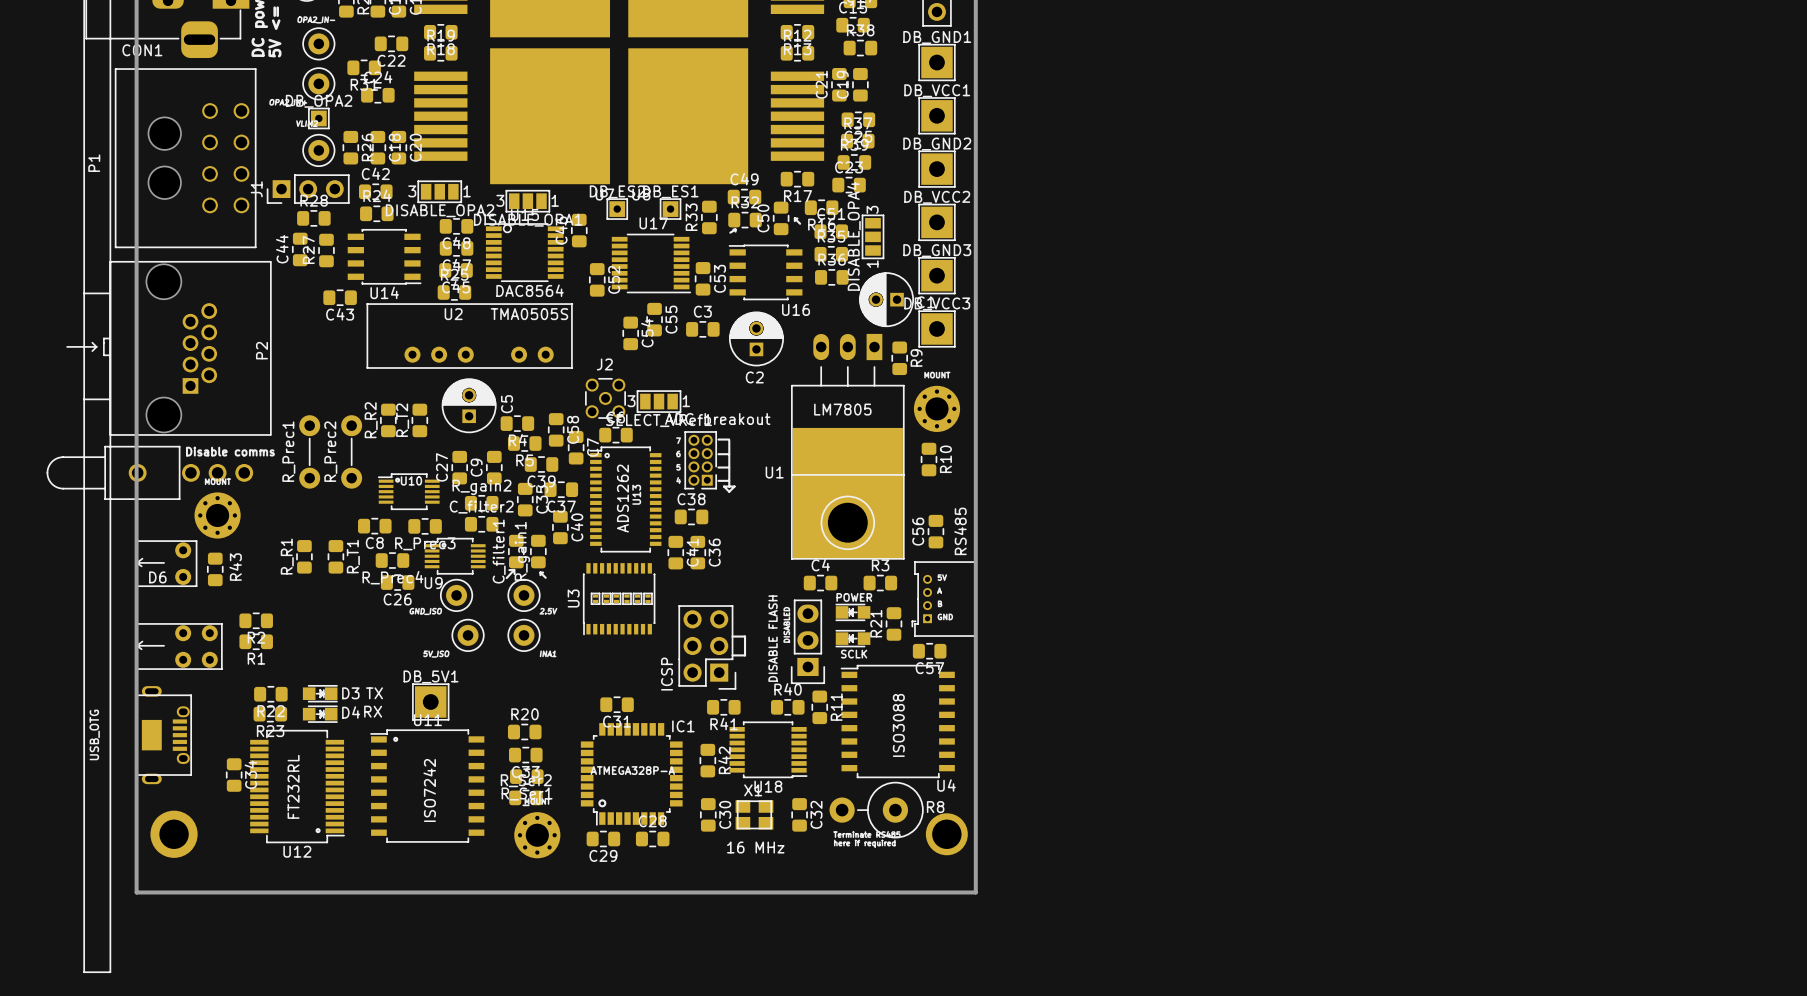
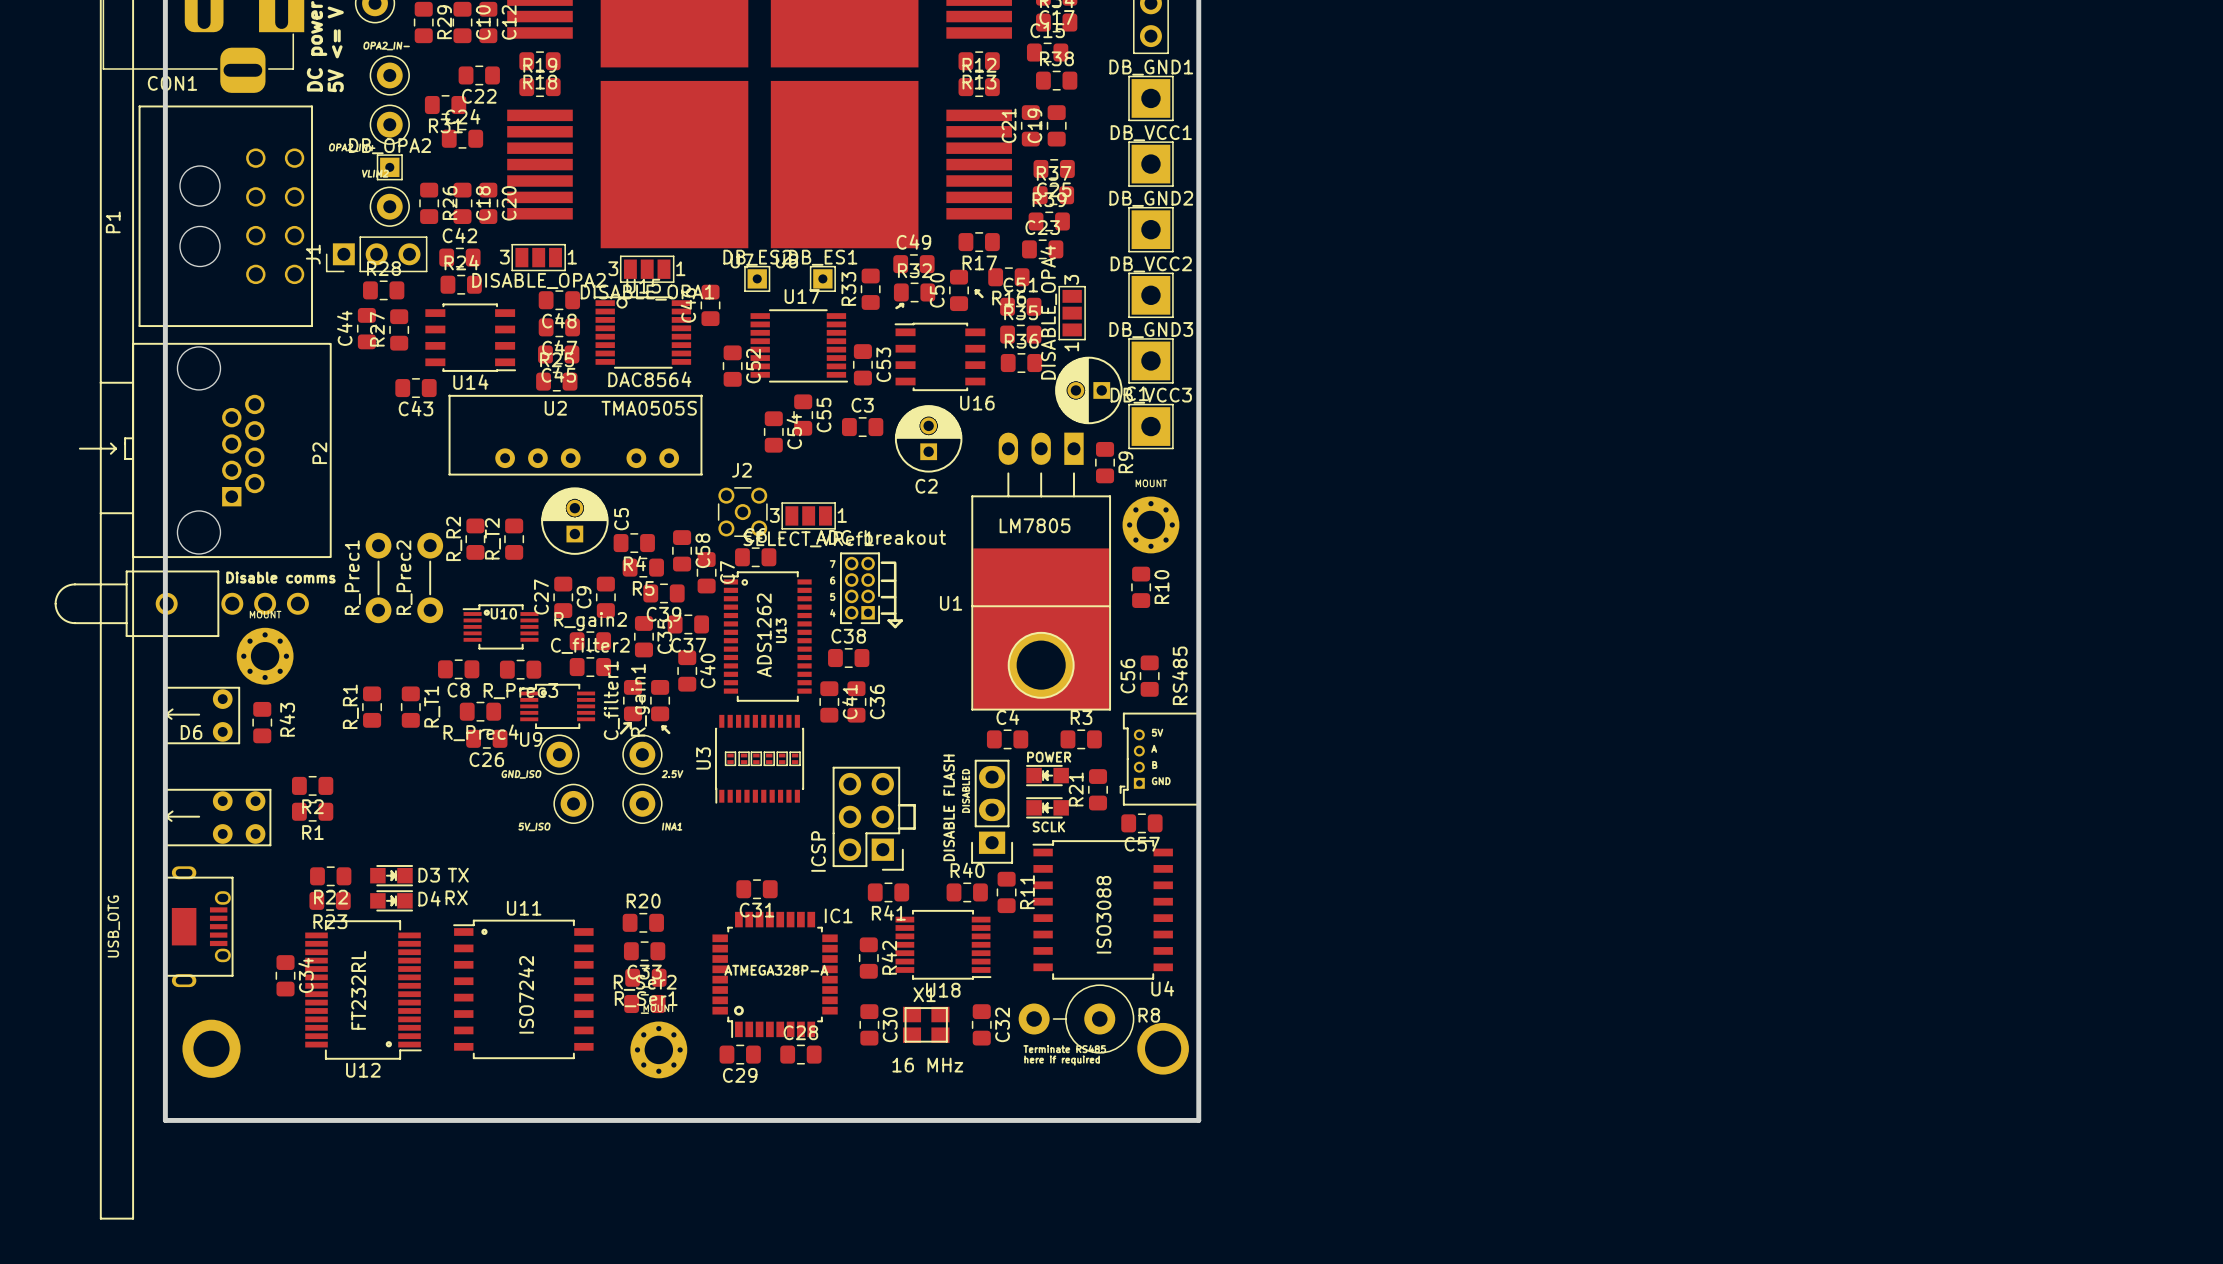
DB_5V1: (430, 701) -> none

